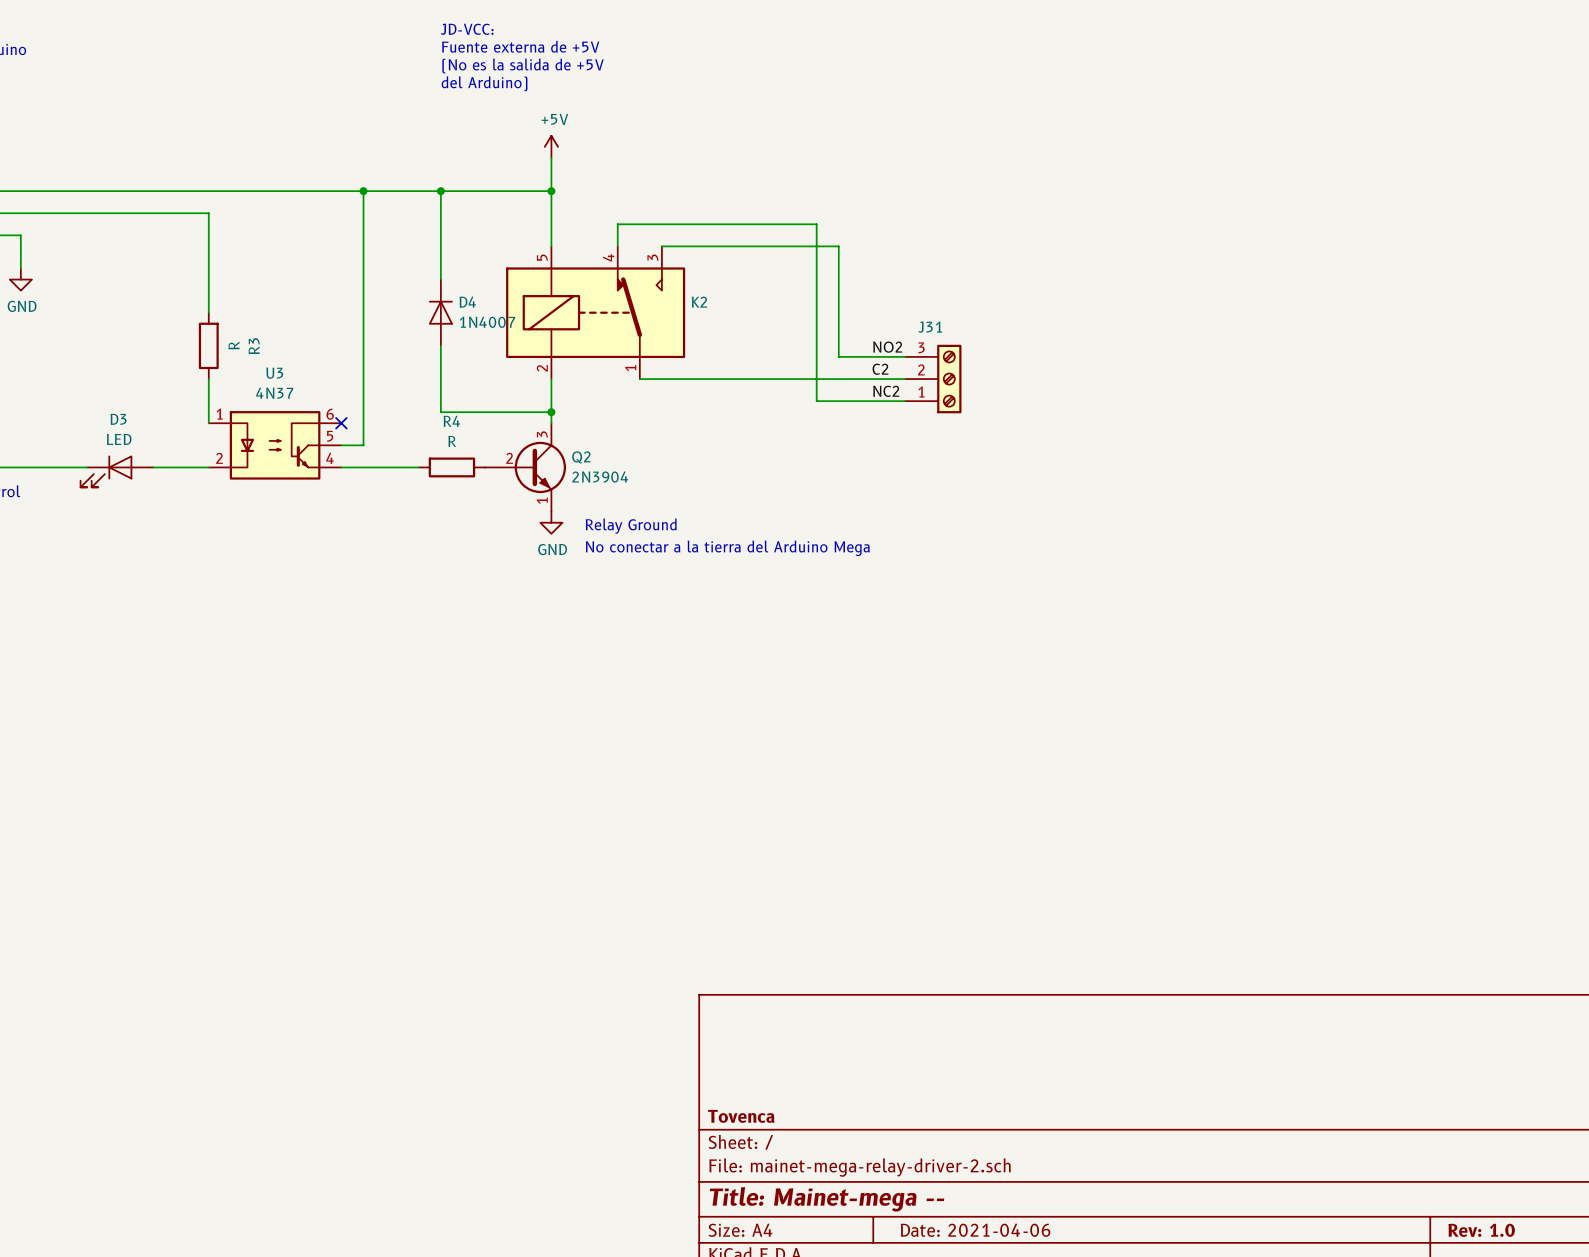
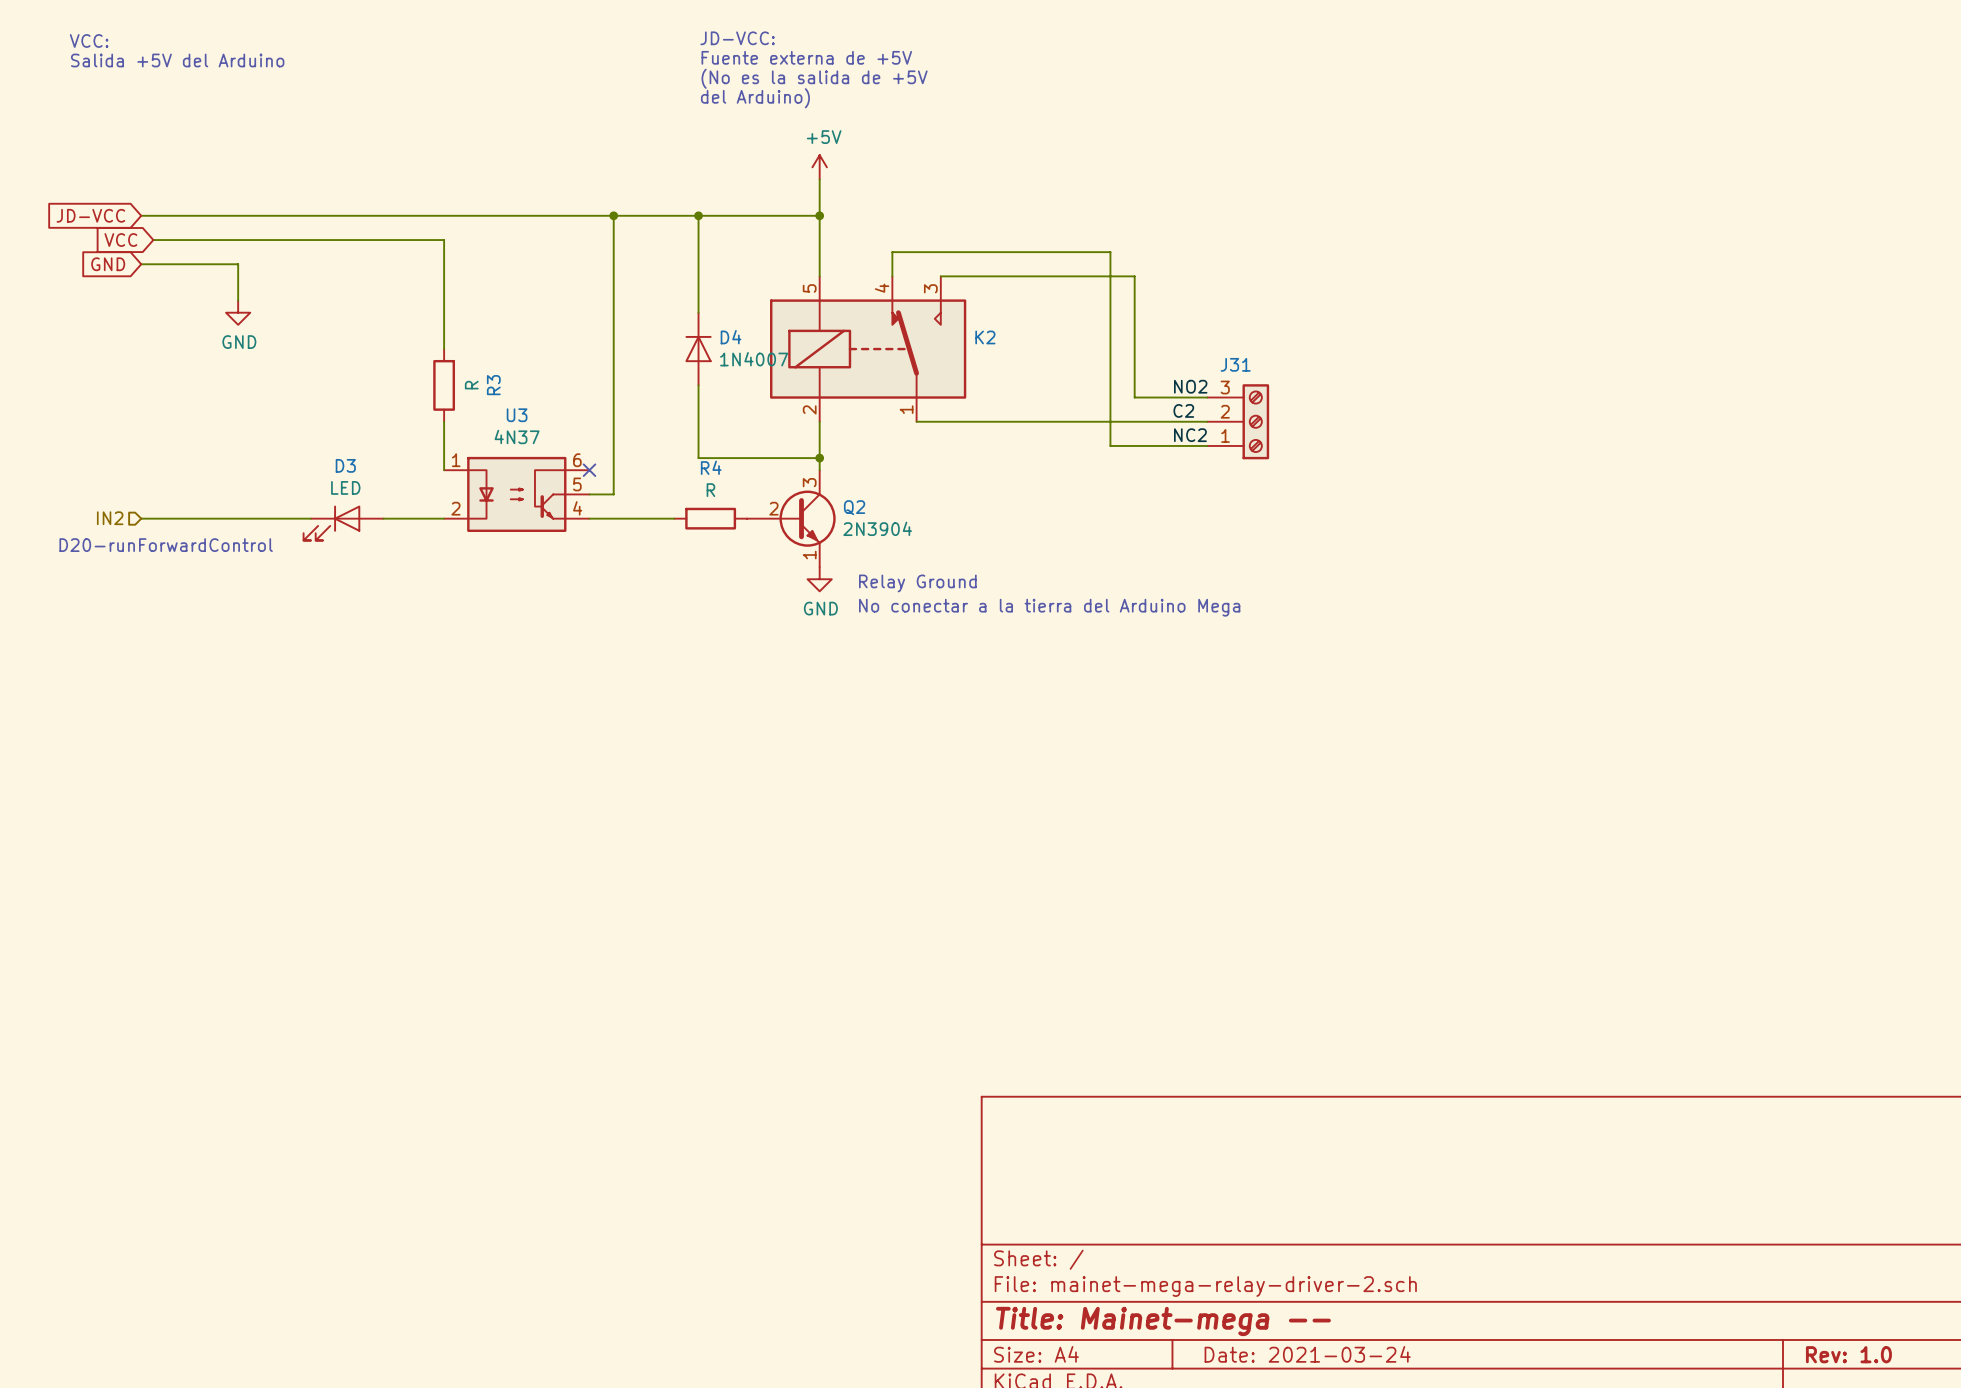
title block: Tovenca (741, 1116) -> none
title block: Date: 2021-04-06 (975, 1230) -> Date: 2021-03-24 (1307, 1354)

